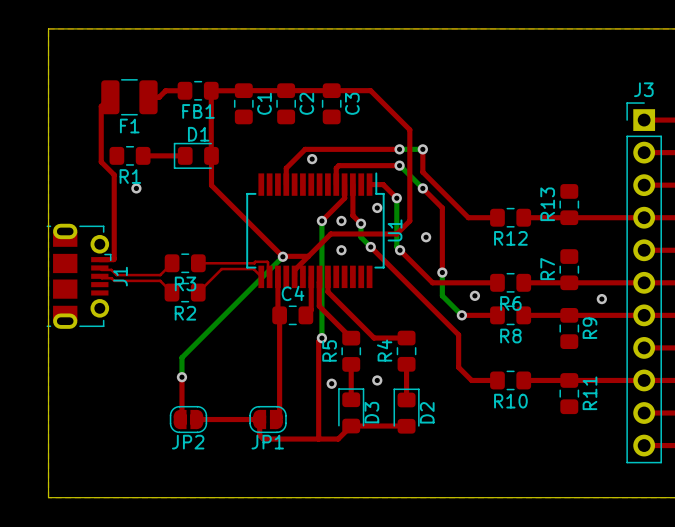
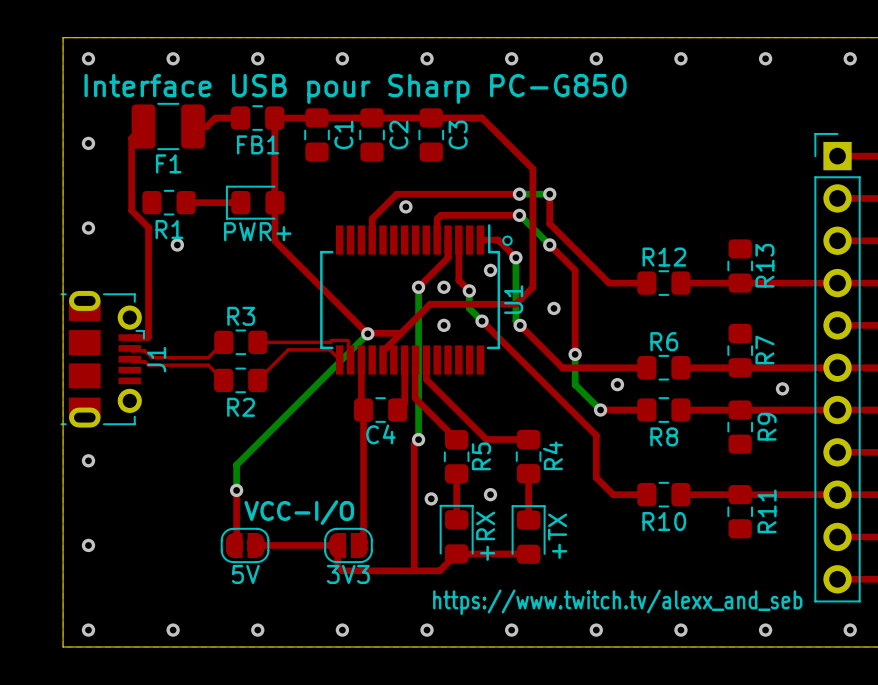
via: none -> (88, 58)
via: none -> (173, 58)
via: none -> (257, 58)
via: none -> (342, 58)
via: none -> (427, 58)
via: none -> (511, 58)
via: none -> (596, 58)
via: none -> (680, 58)
via: none -> (765, 58)
via: none -> (850, 58)
text: none -> Interface USB pour Sharp PC-G850 (355, 88)
J3 name: J3 (643, 89) -> none
via: none -> (88, 143)
D1 name: D1 (198, 134) -> none
via: none -> (88, 228)
text: none -> PWR+ (257, 231)
drawing: none -> [502, 235, 513, 246]
R13 name position: R13 (547, 204) -> R13 (764, 265)
R12 name position: R12 (510, 238) -> R12 (664, 257)
R7 name position: R7 (547, 269) -> R7 (764, 349)
R3 name position: R3 (185, 283) -> R3 (241, 316)
C4 name position: C4 (293, 293) -> C4 (380, 434)
R6 name position: R6 (510, 303) -> R6 (664, 341)
R5 name position: R5 (329, 350) -> R5 (481, 456)
R4 name position: R4 (384, 350) -> R4 (552, 455)
via: none -> (88, 460)
text: none -> VCC-I/O (299, 512)
D3 name: D3 (371, 412) -> none
text: none -> +RX (485, 536)
D2 name: D2 (427, 412) -> none
text: none -> +TX (557, 536)
via: none -> (88, 545)
text: none -> 5V (245, 574)
text: none -> 3V3 (348, 574)
JP2 name: JP2 (188, 442) -> none
JP1 name: JP1 (267, 442) -> none
text: none -> https://www.twitch.tv/alexx_and_seb (617, 602)
via: none -> (88, 630)
via: none -> (173, 630)
via: none -> (257, 630)
via: none -> (342, 630)
via: none -> (427, 630)
via: none -> (511, 630)
via: none -> (596, 630)
via: none -> (680, 630)
via: none -> (765, 630)
via: none -> (850, 630)

